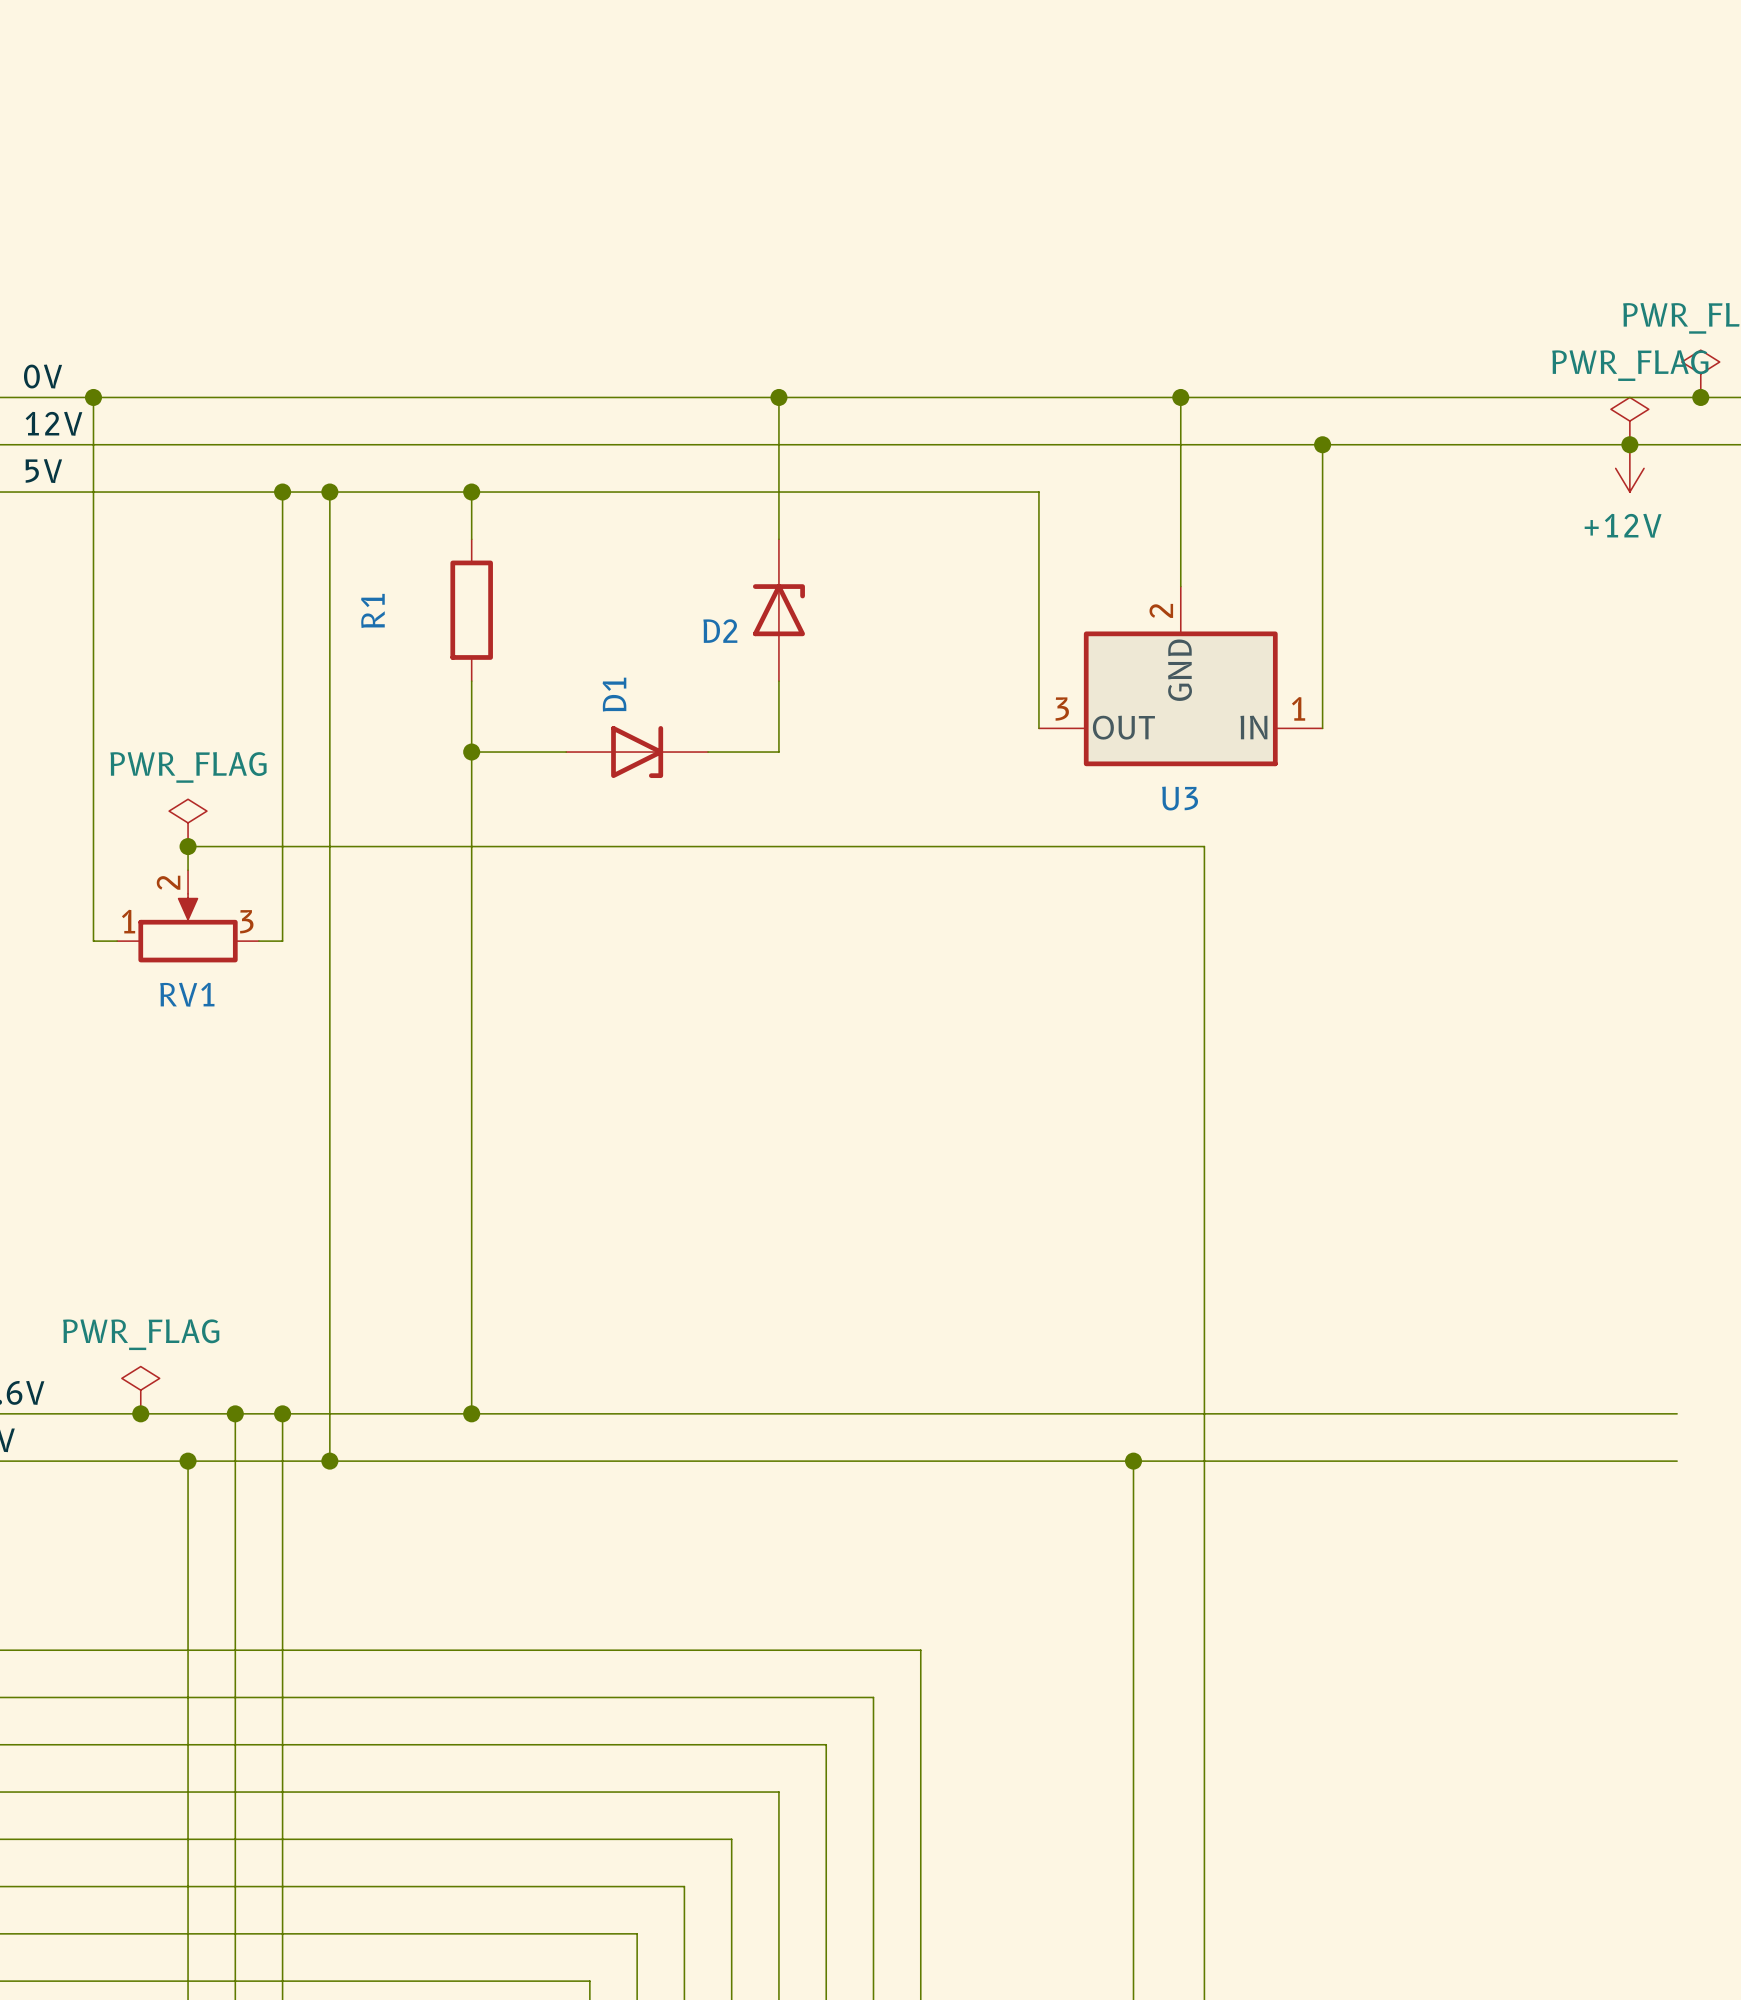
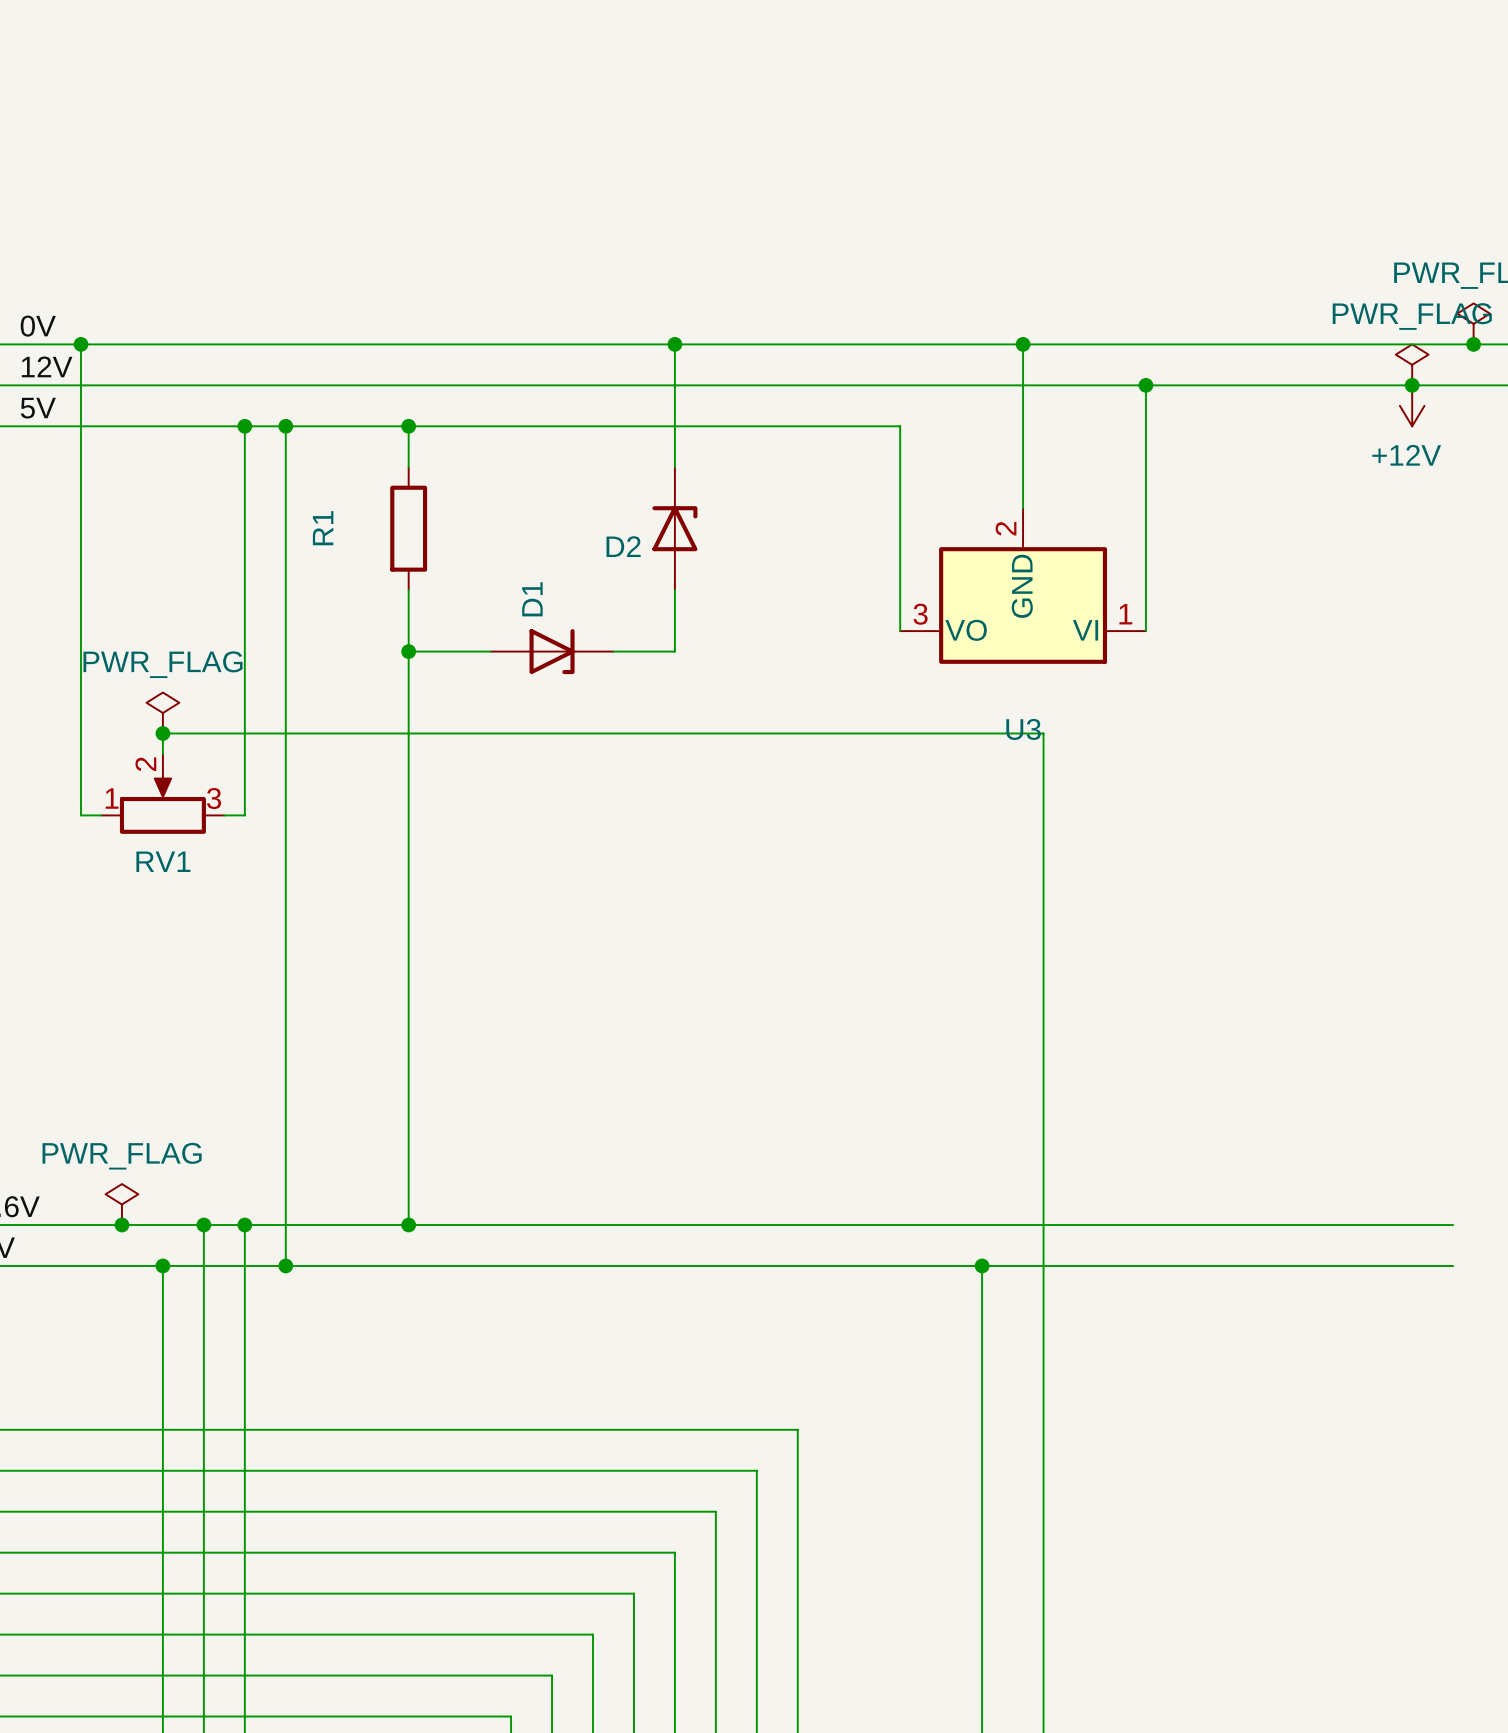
U3 pin name: OUT (1123, 727) -> VO (966, 630)
U3 pin name: IN (1253, 727) -> VI (1085, 630)
U3 name position: U3 (1180, 798) -> U3 (1023, 729)

